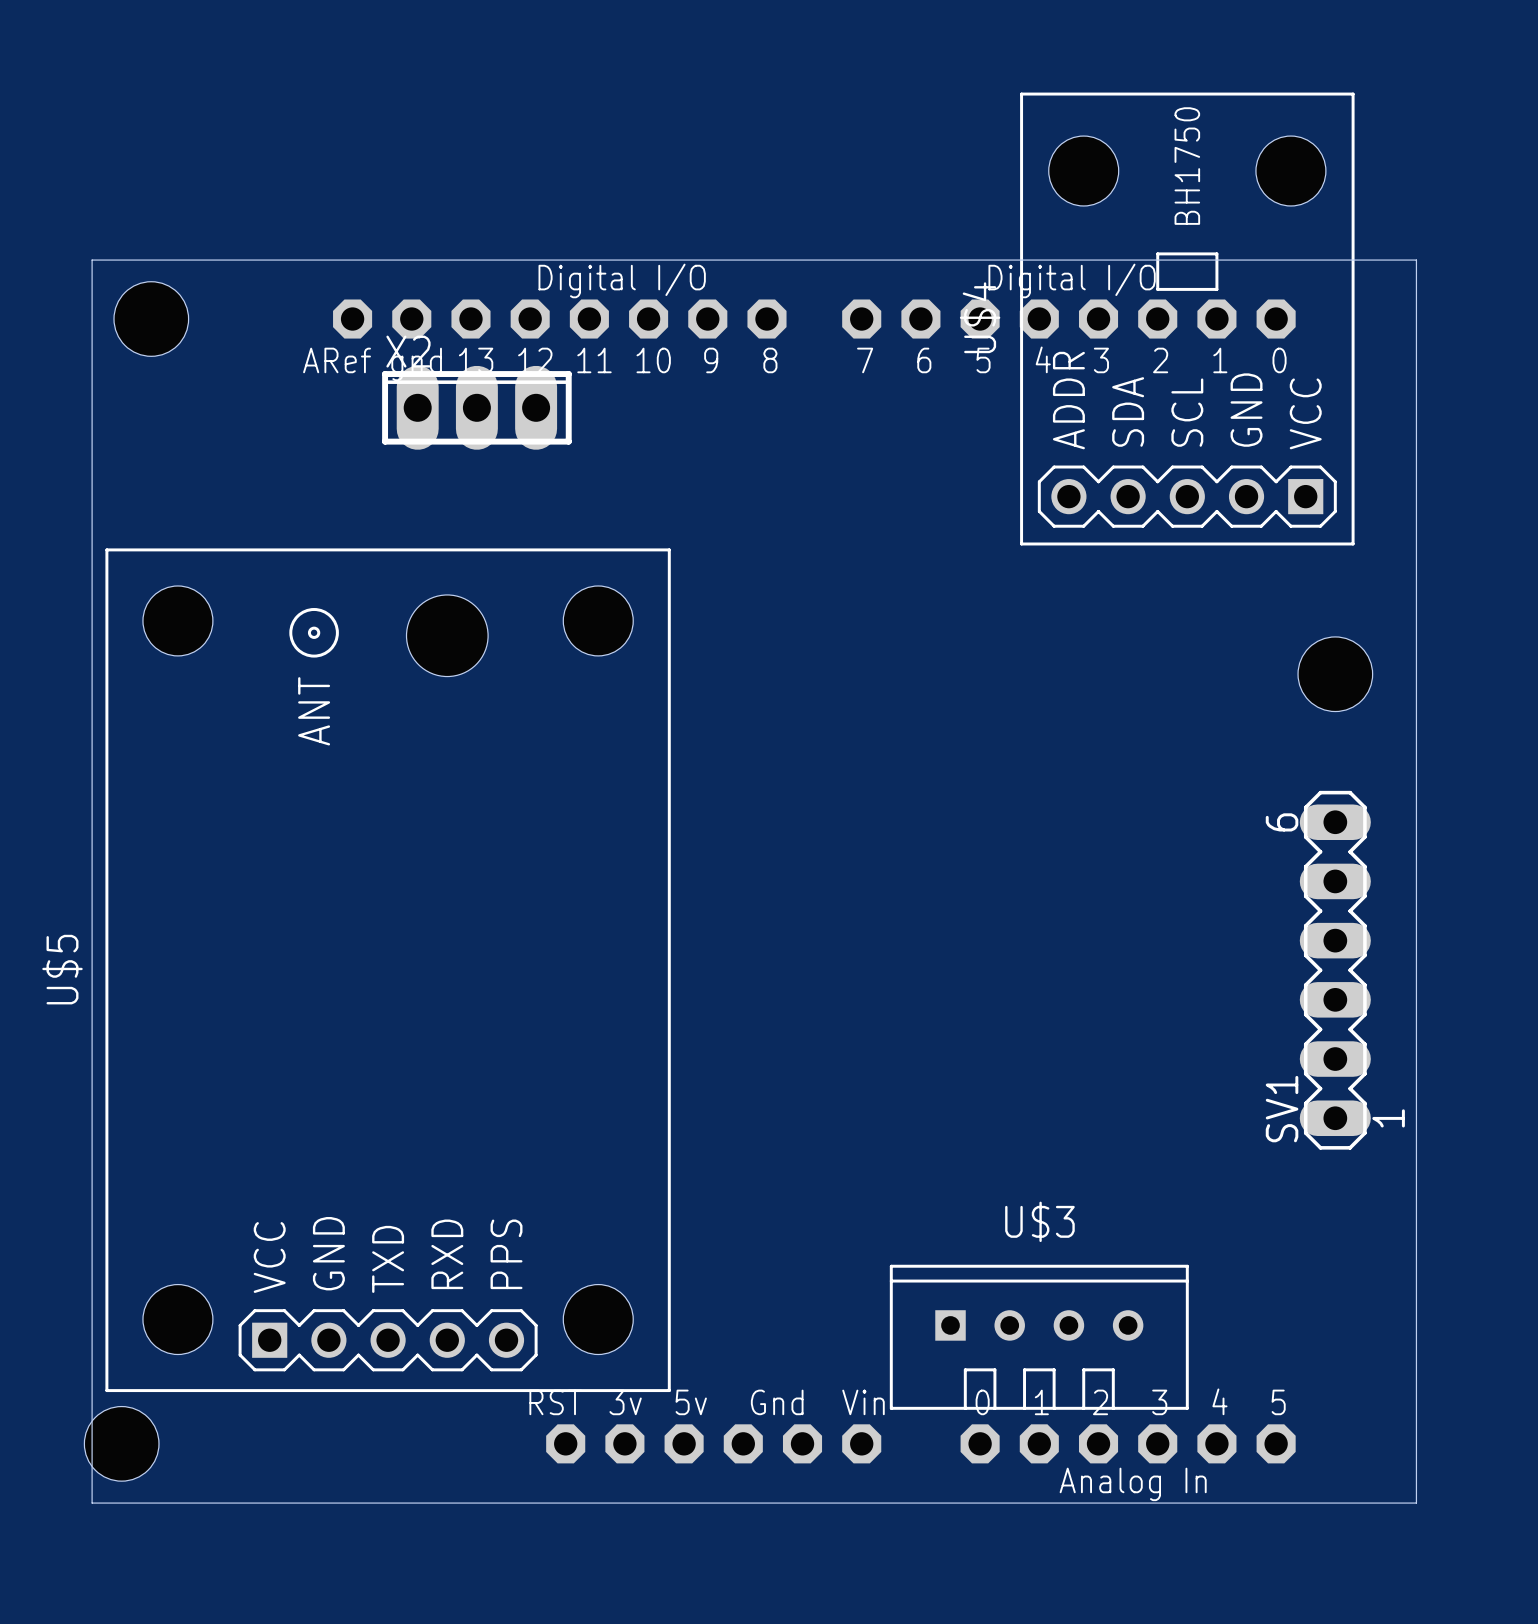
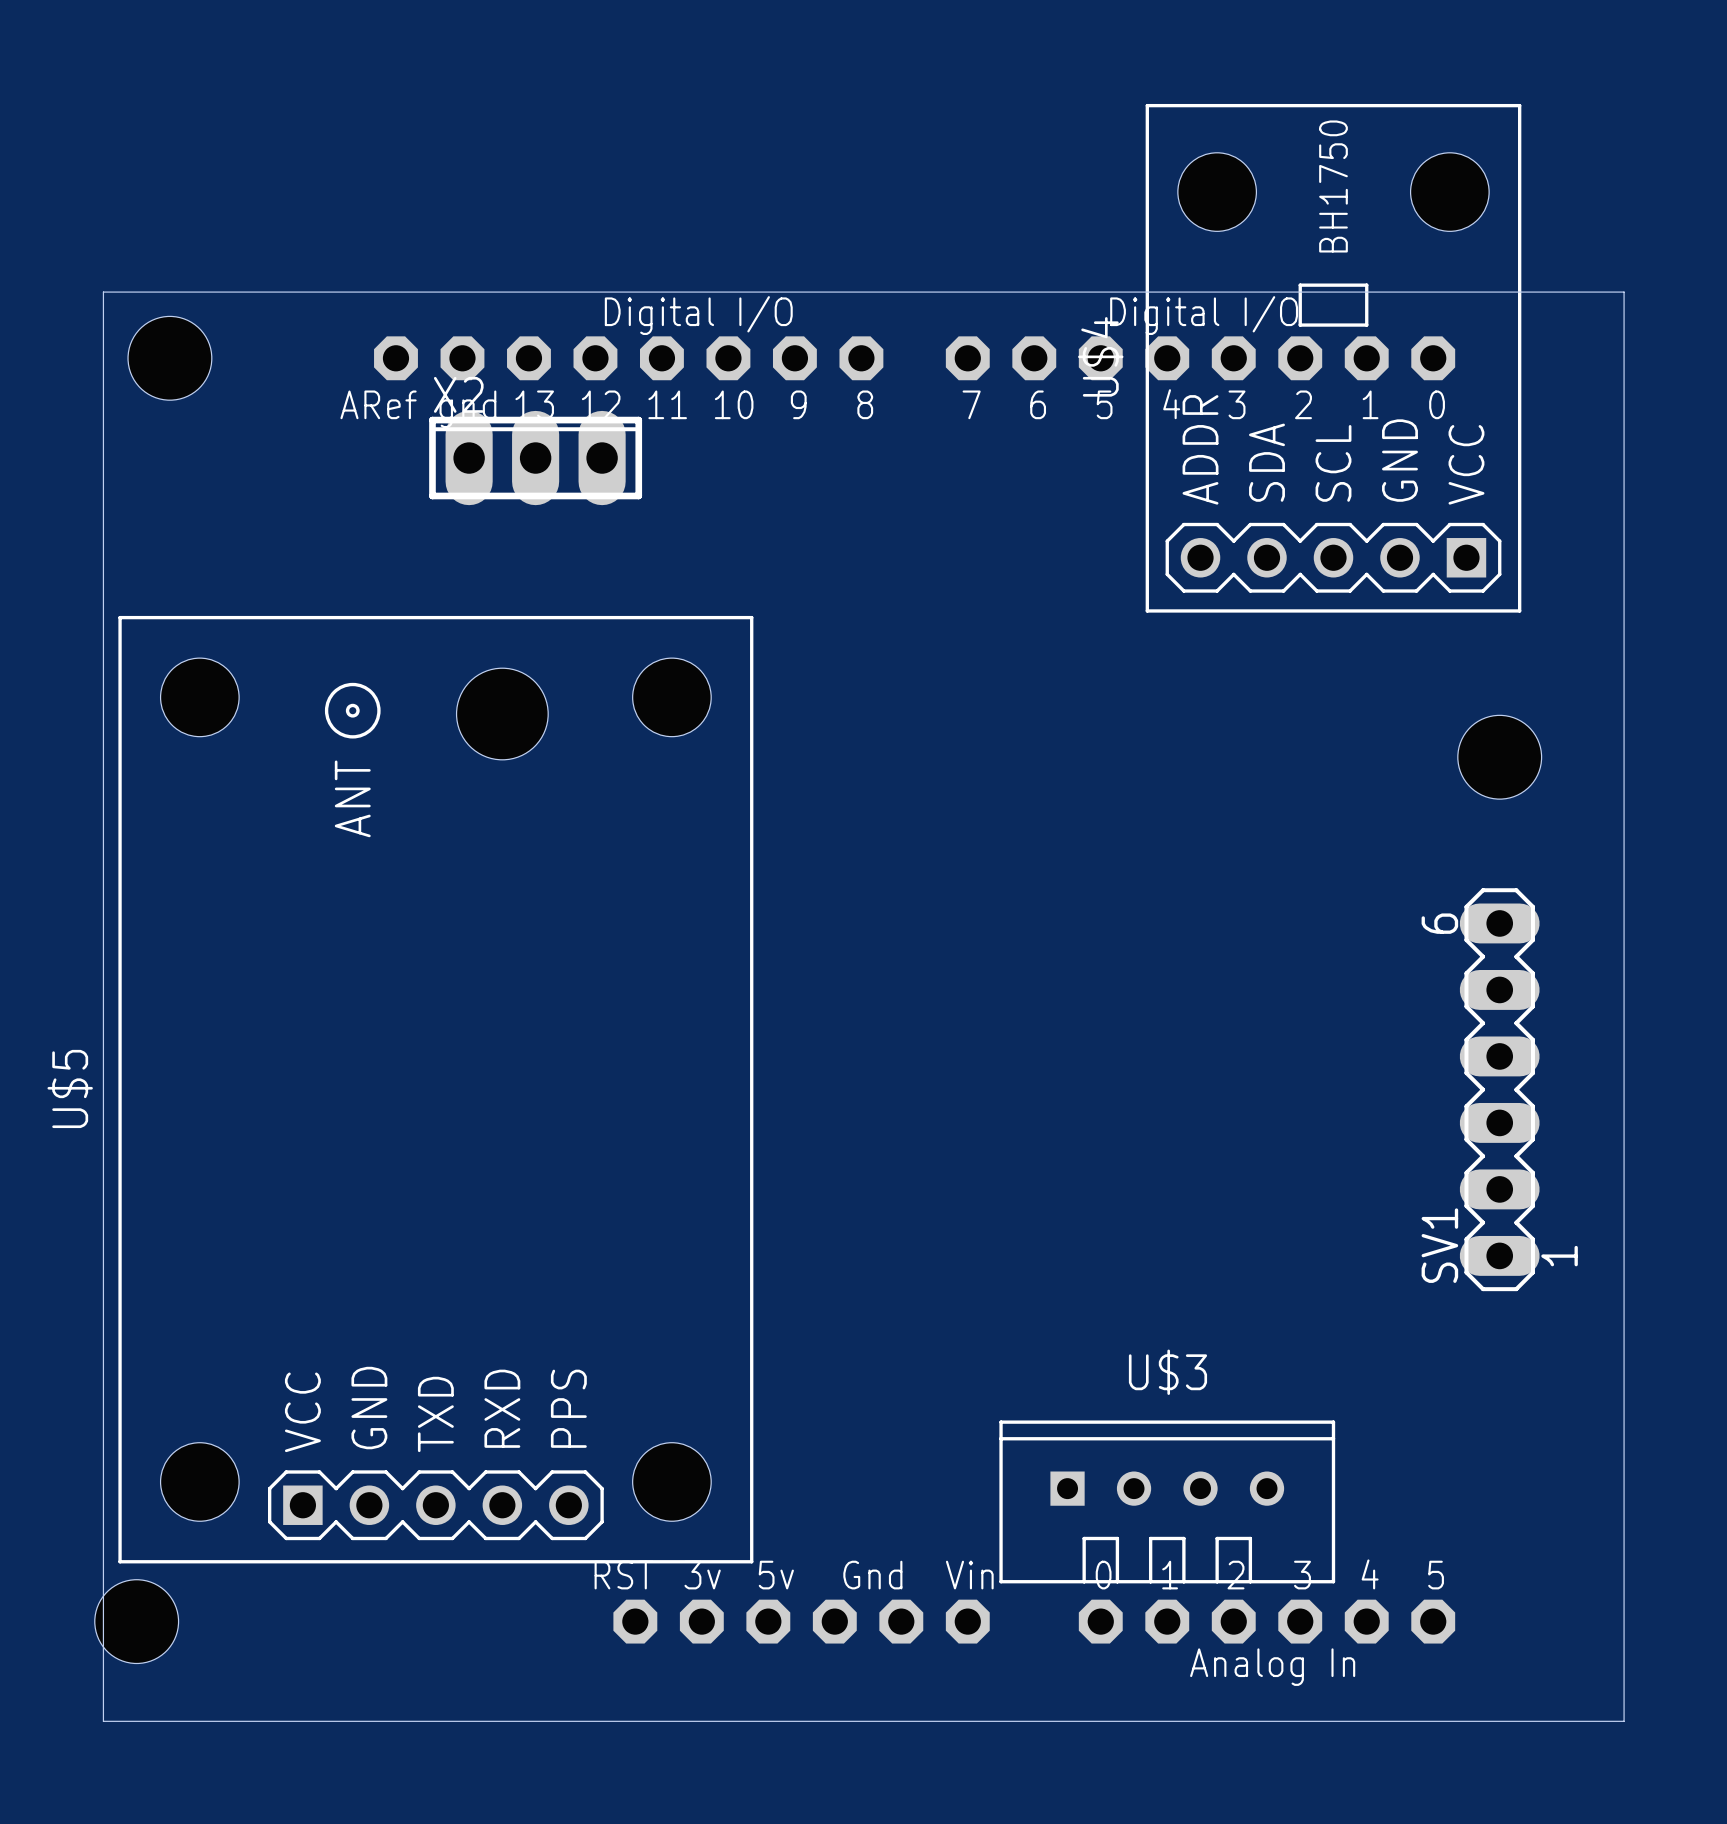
board edge: (1416, 260) (1416, 1503) (92, 1503) -> (1590, 292) (1624, 292) (1624, 1721) (103, 1721) (103, 1688)

